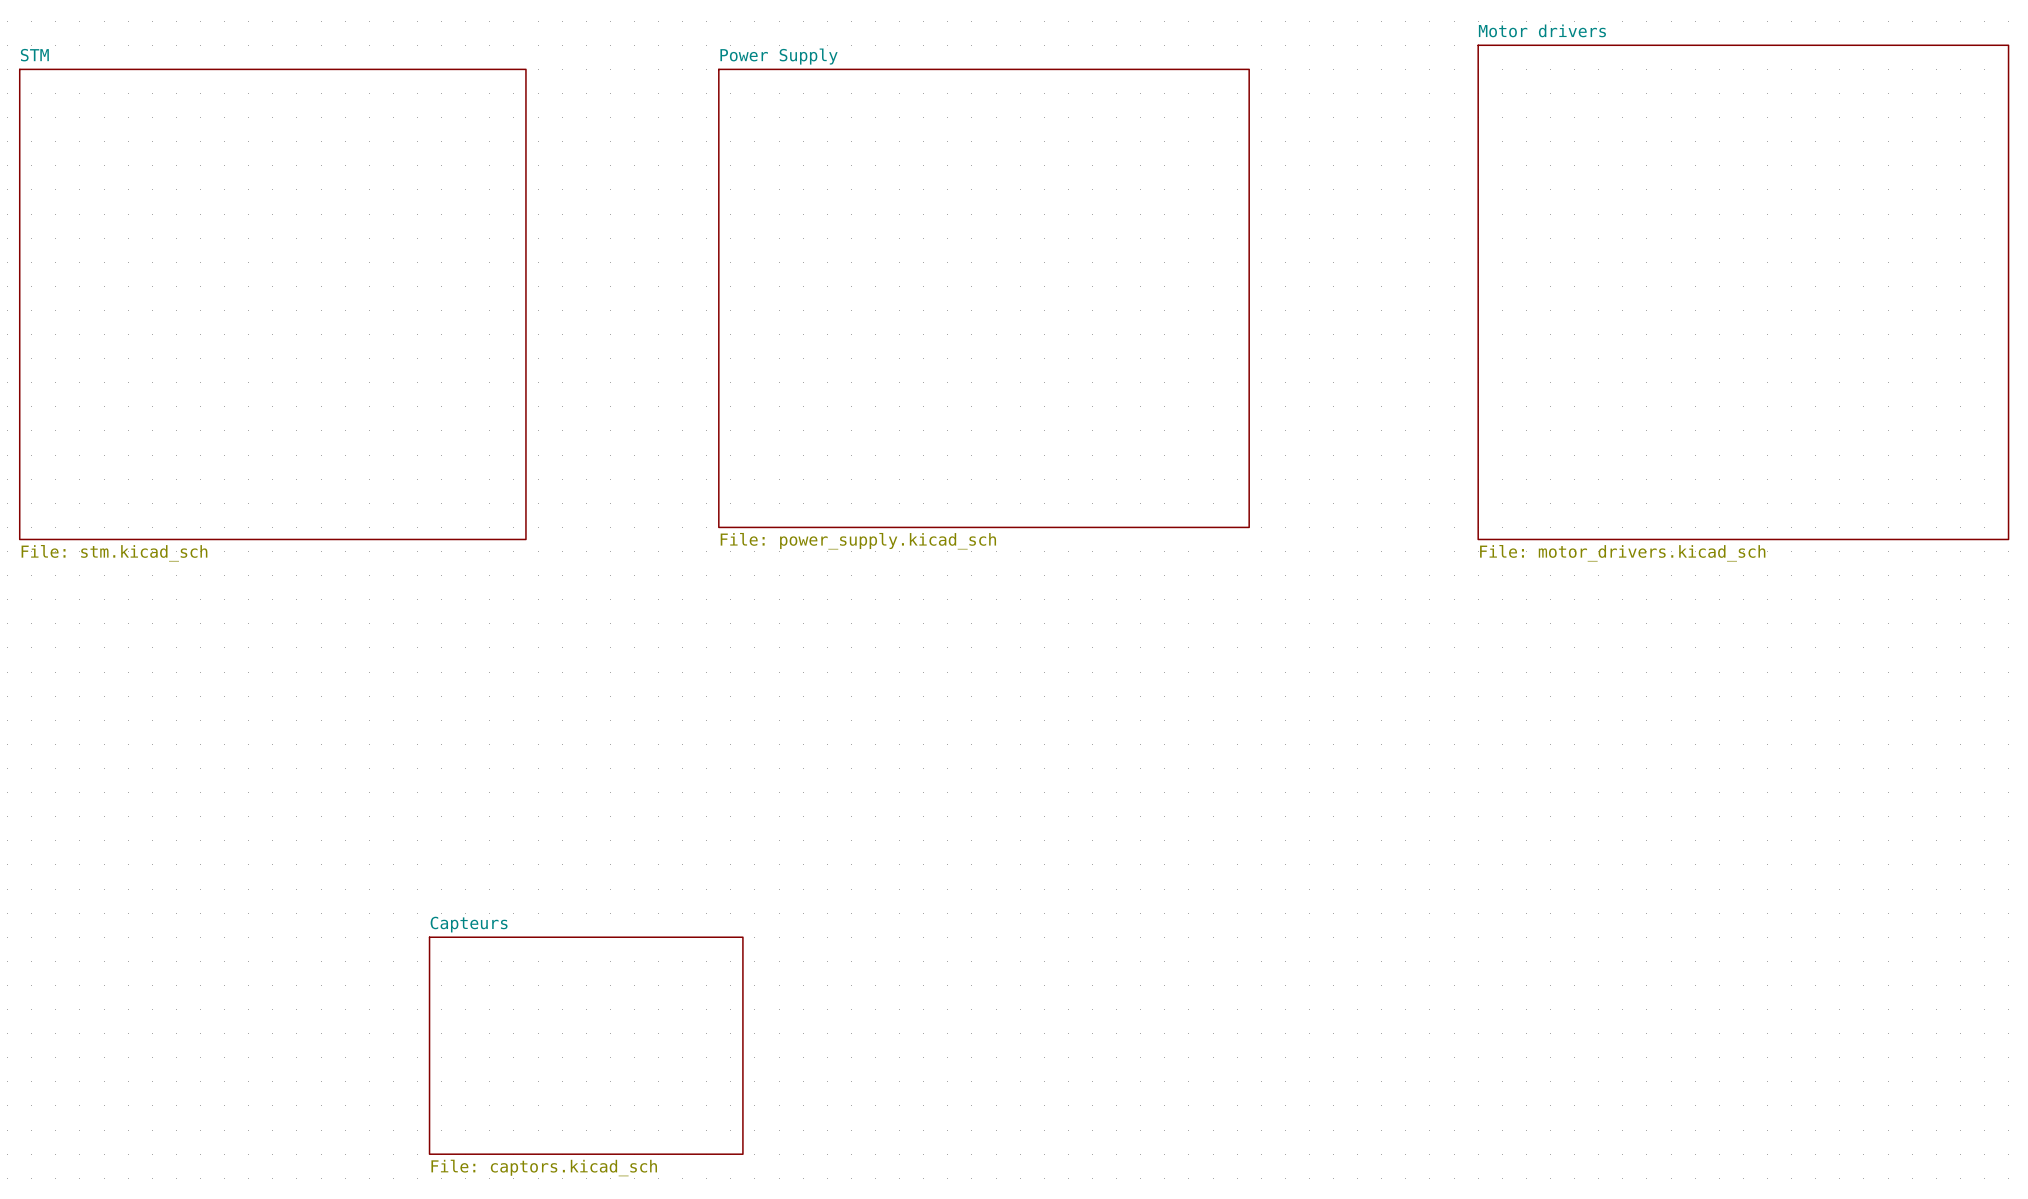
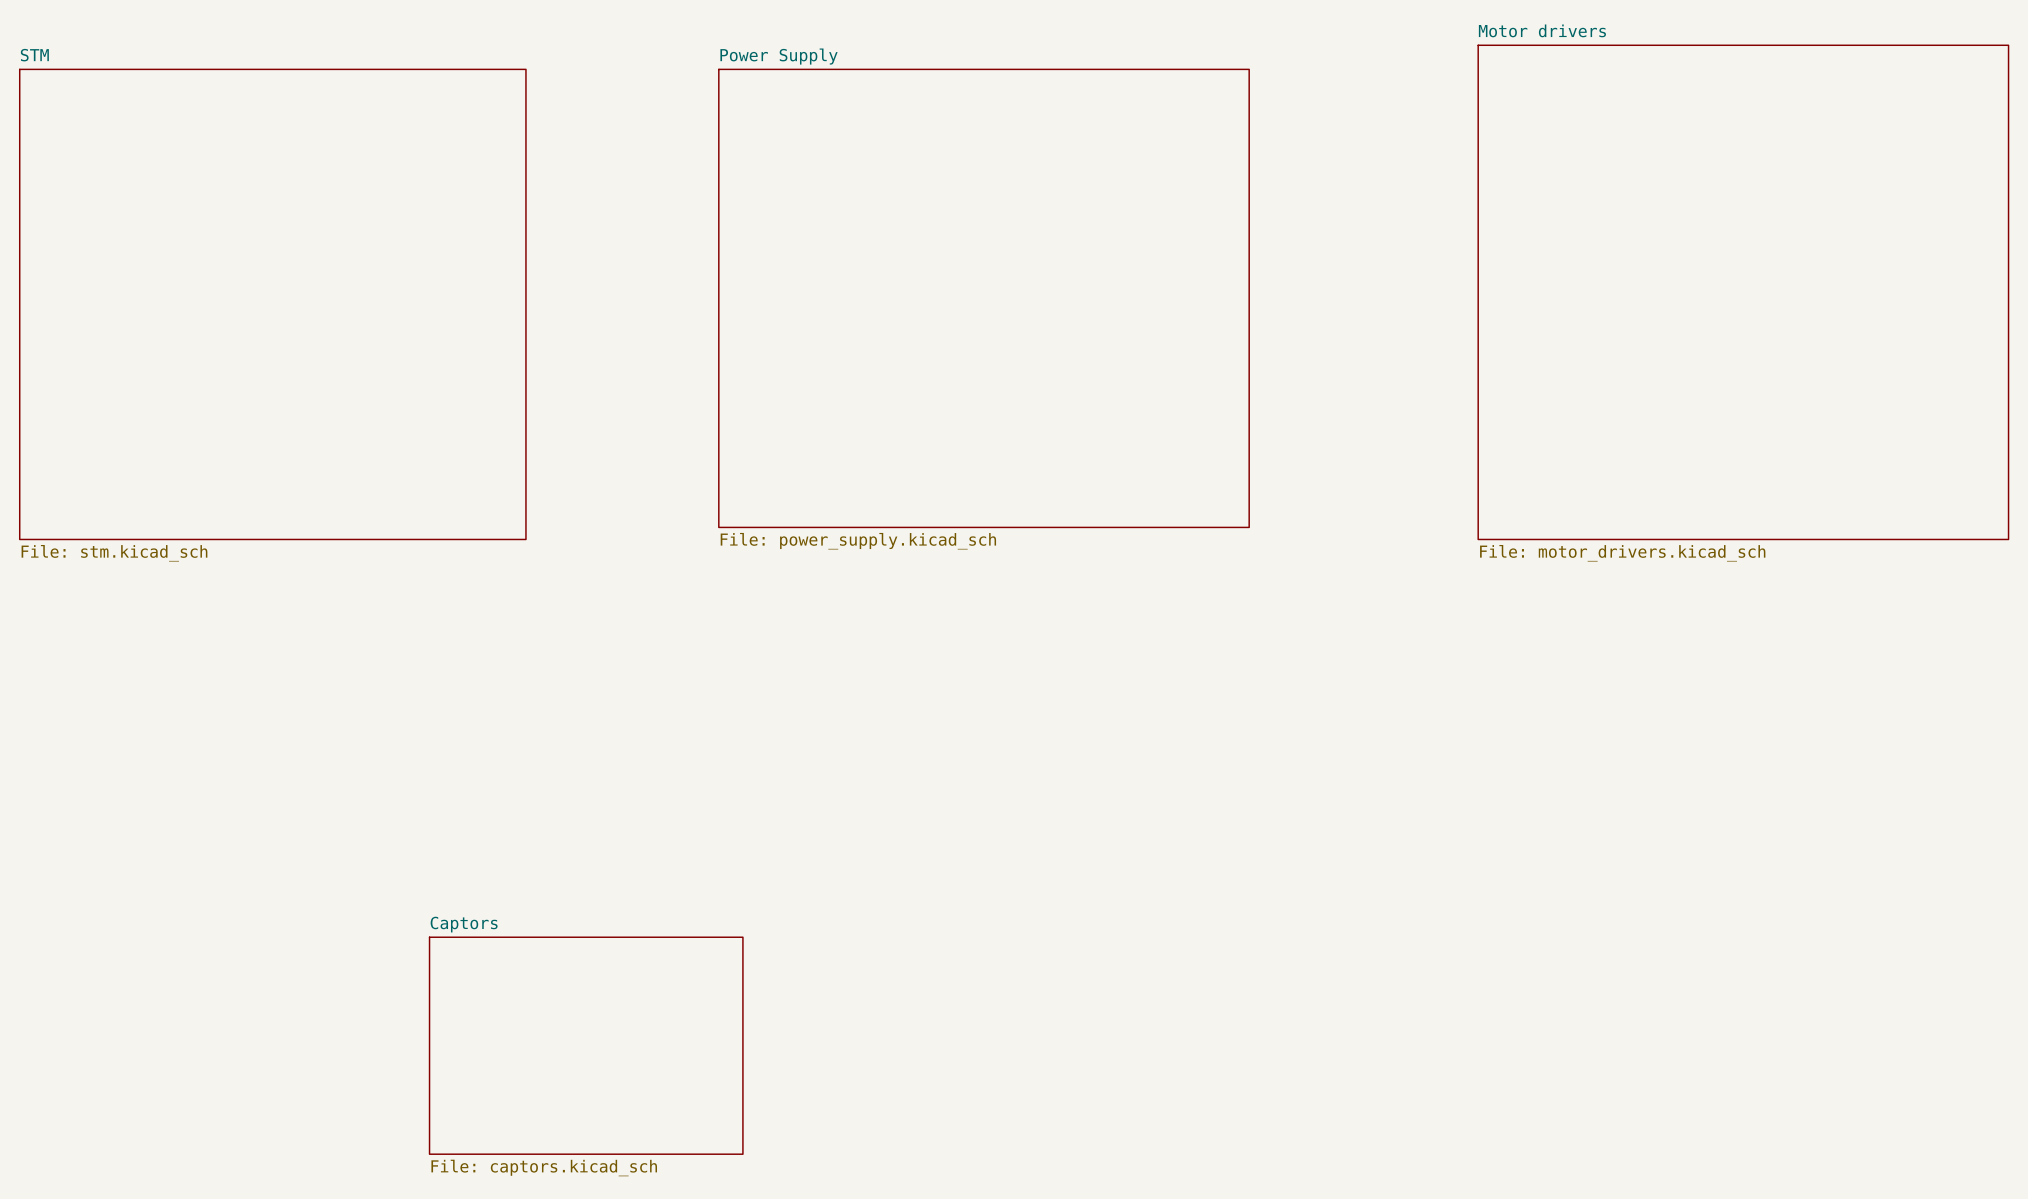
sheet Capteurs name: Capteurs (469, 924) -> Captors (464, 924)

